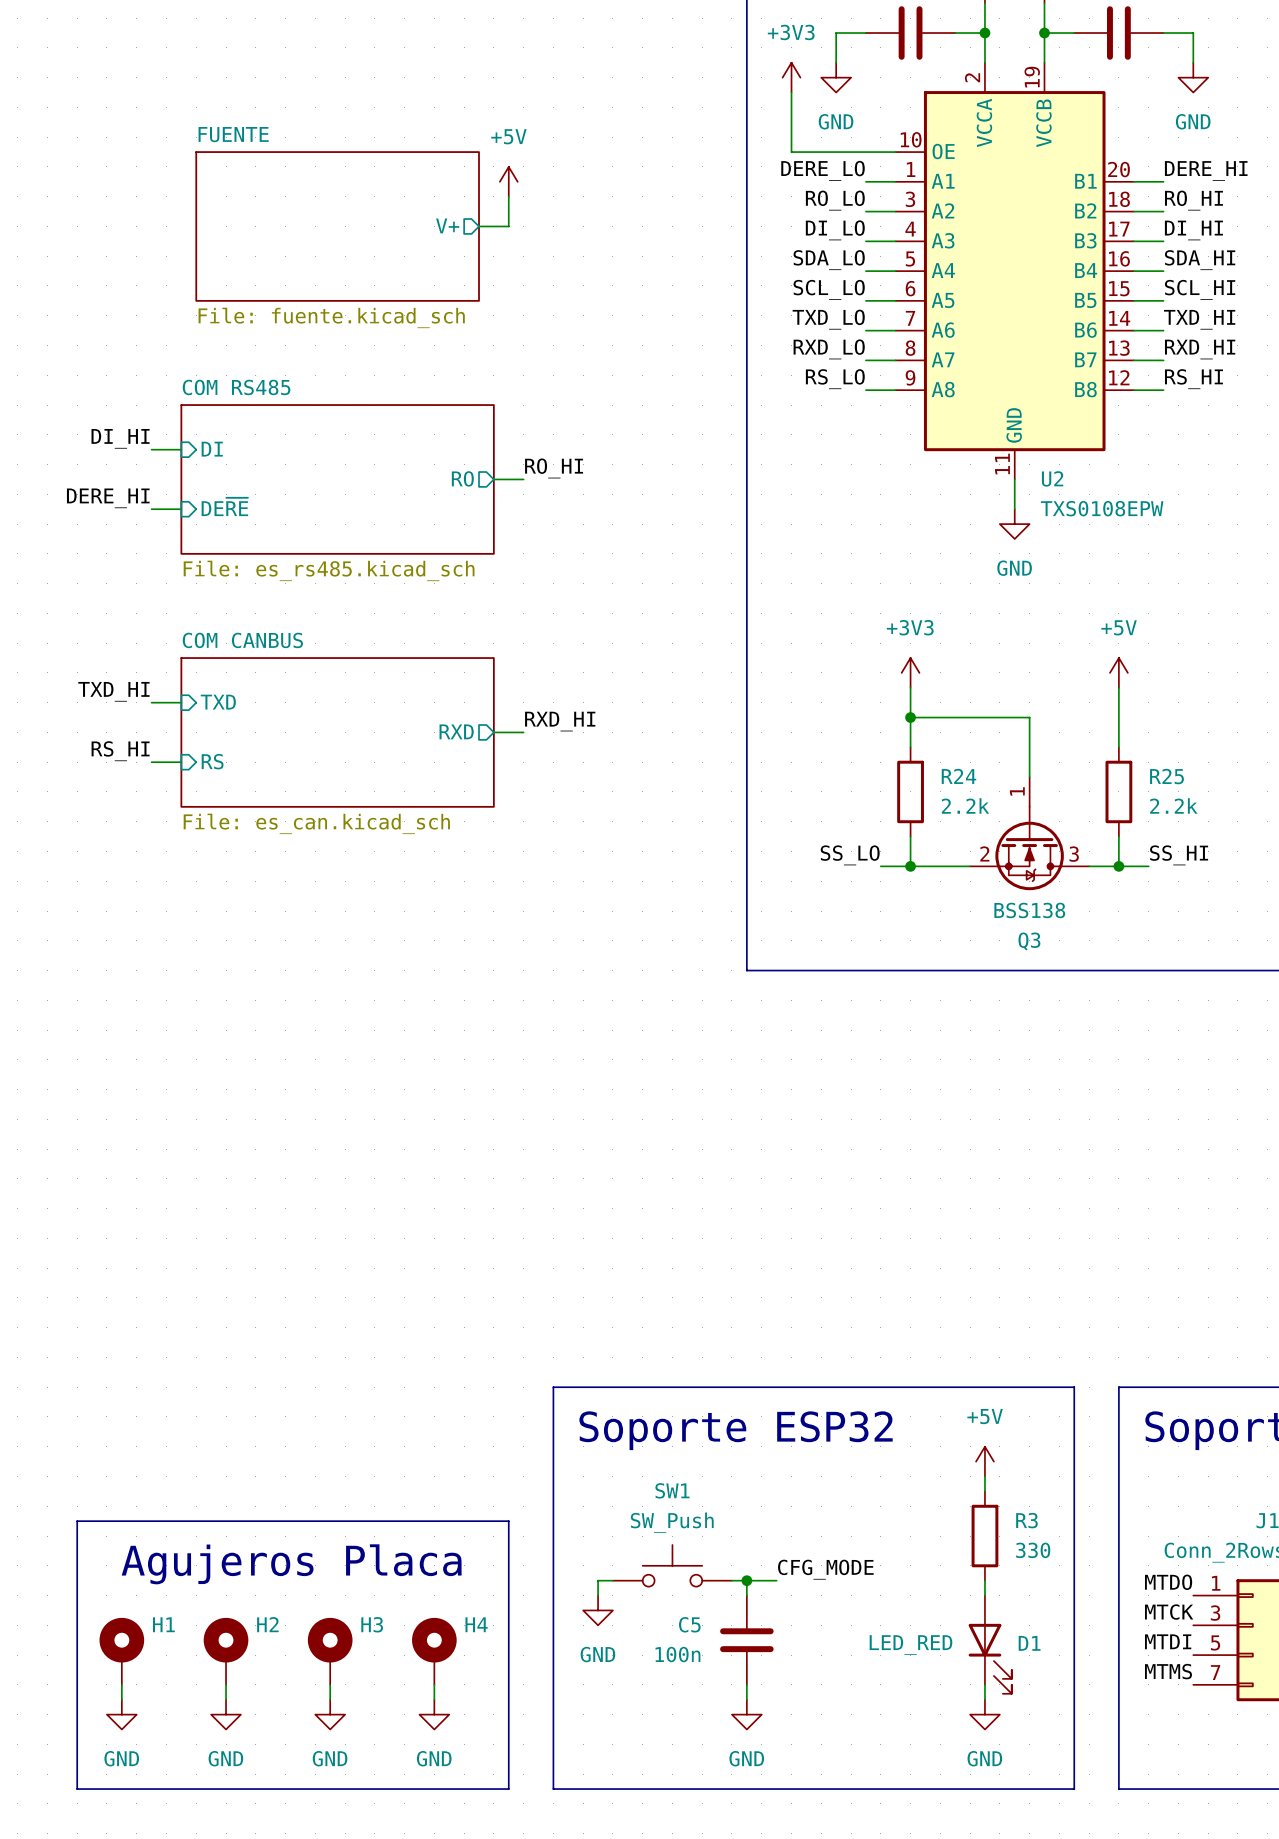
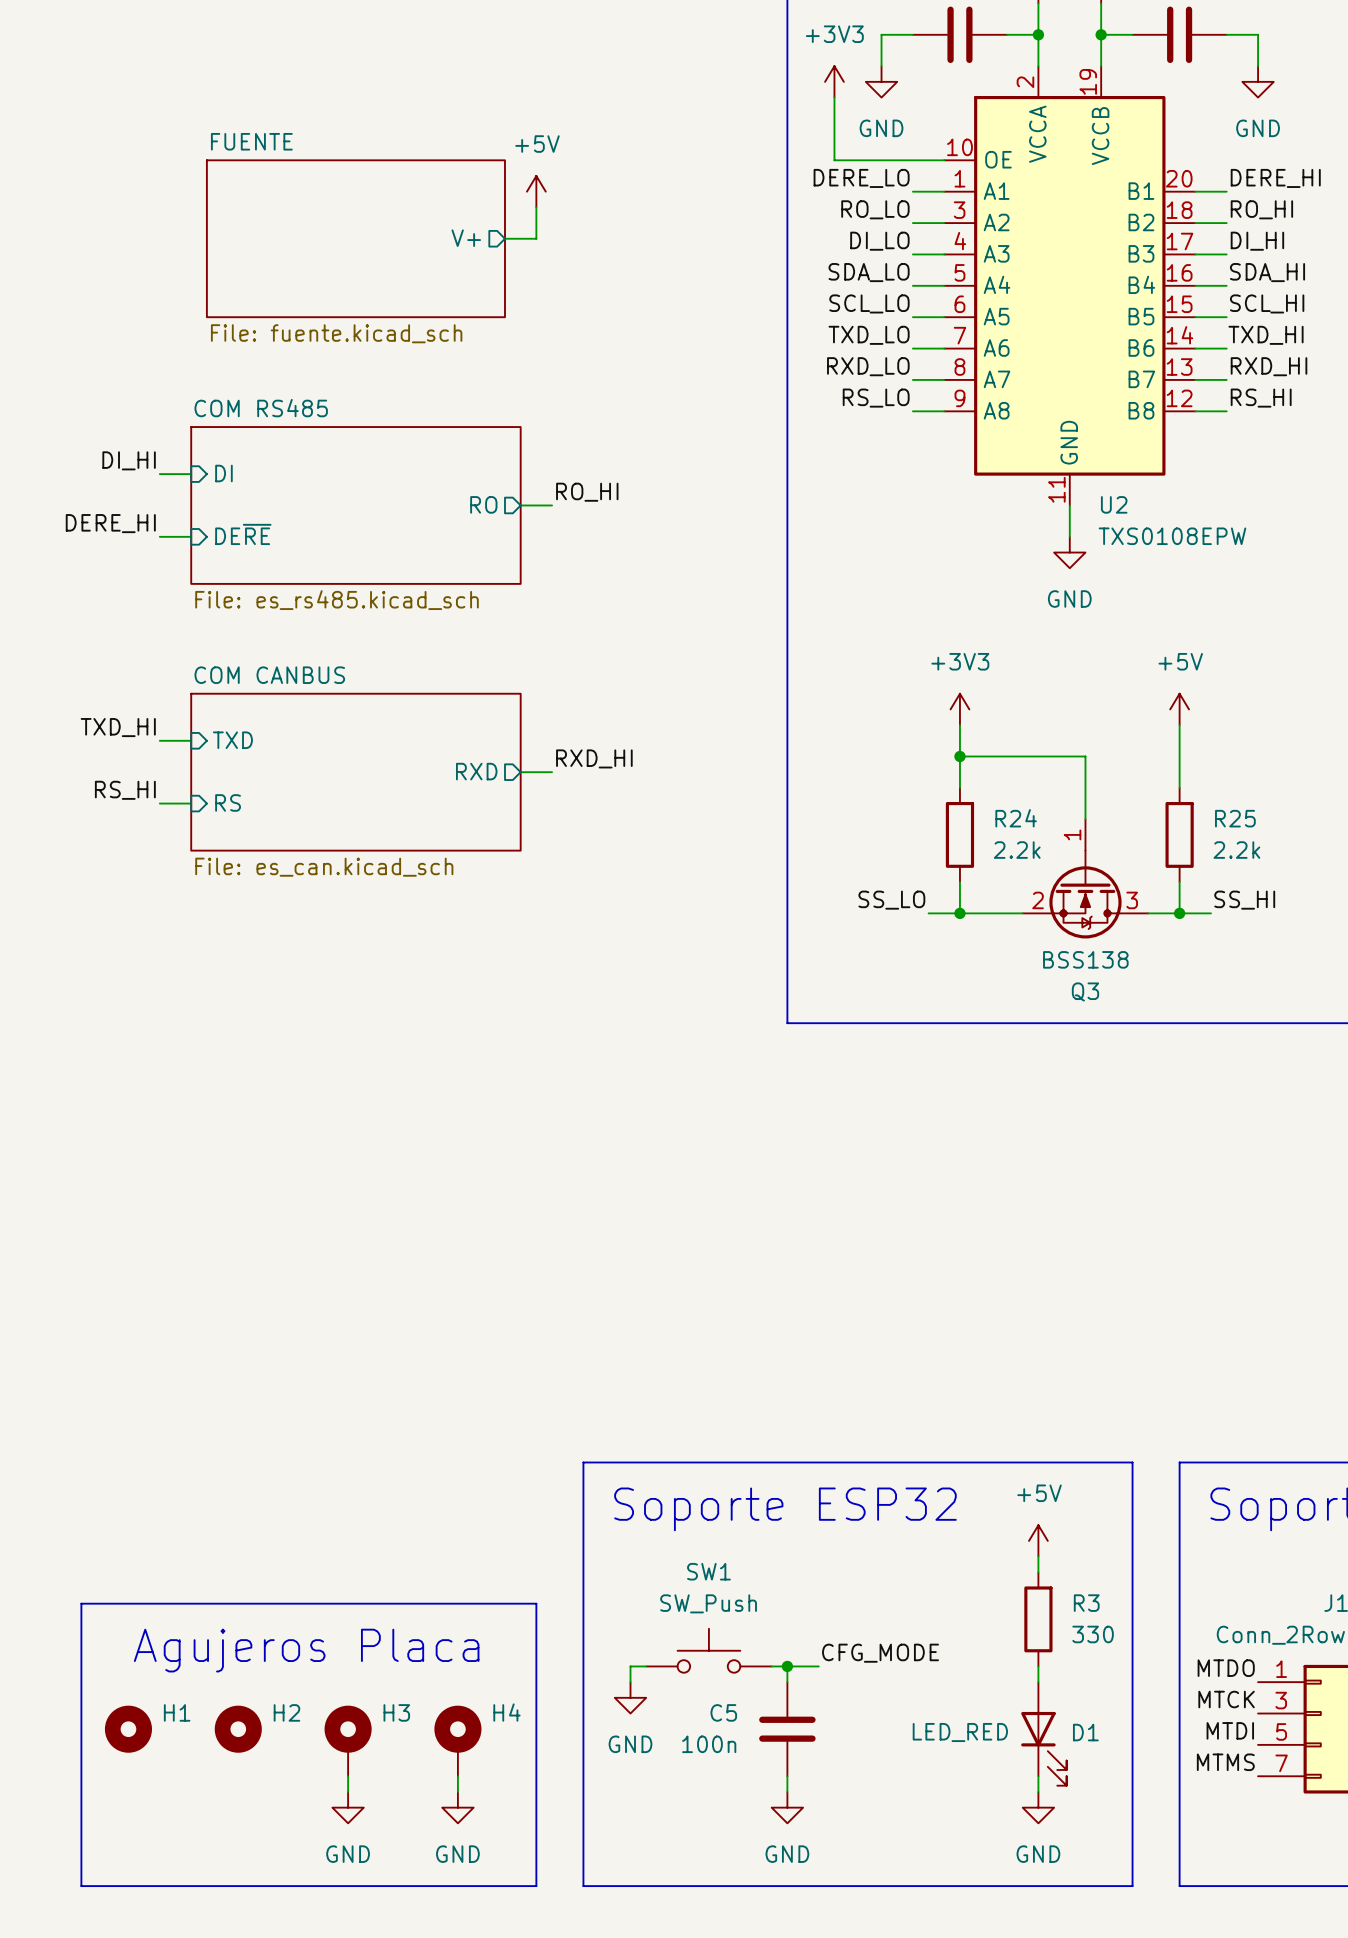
H1 symbol: [99, 1617, 145, 1685] -> [104, 1705, 152, 1753]
H2 symbol: [203, 1617, 249, 1685] -> [214, 1705, 262, 1753]
wire: (121, 1684) (121, 1699) -> none
wire: (226, 1684) (226, 1699) -> none
power symbol: GND (121, 1714) -> none
power symbol: GND (226, 1714) -> none

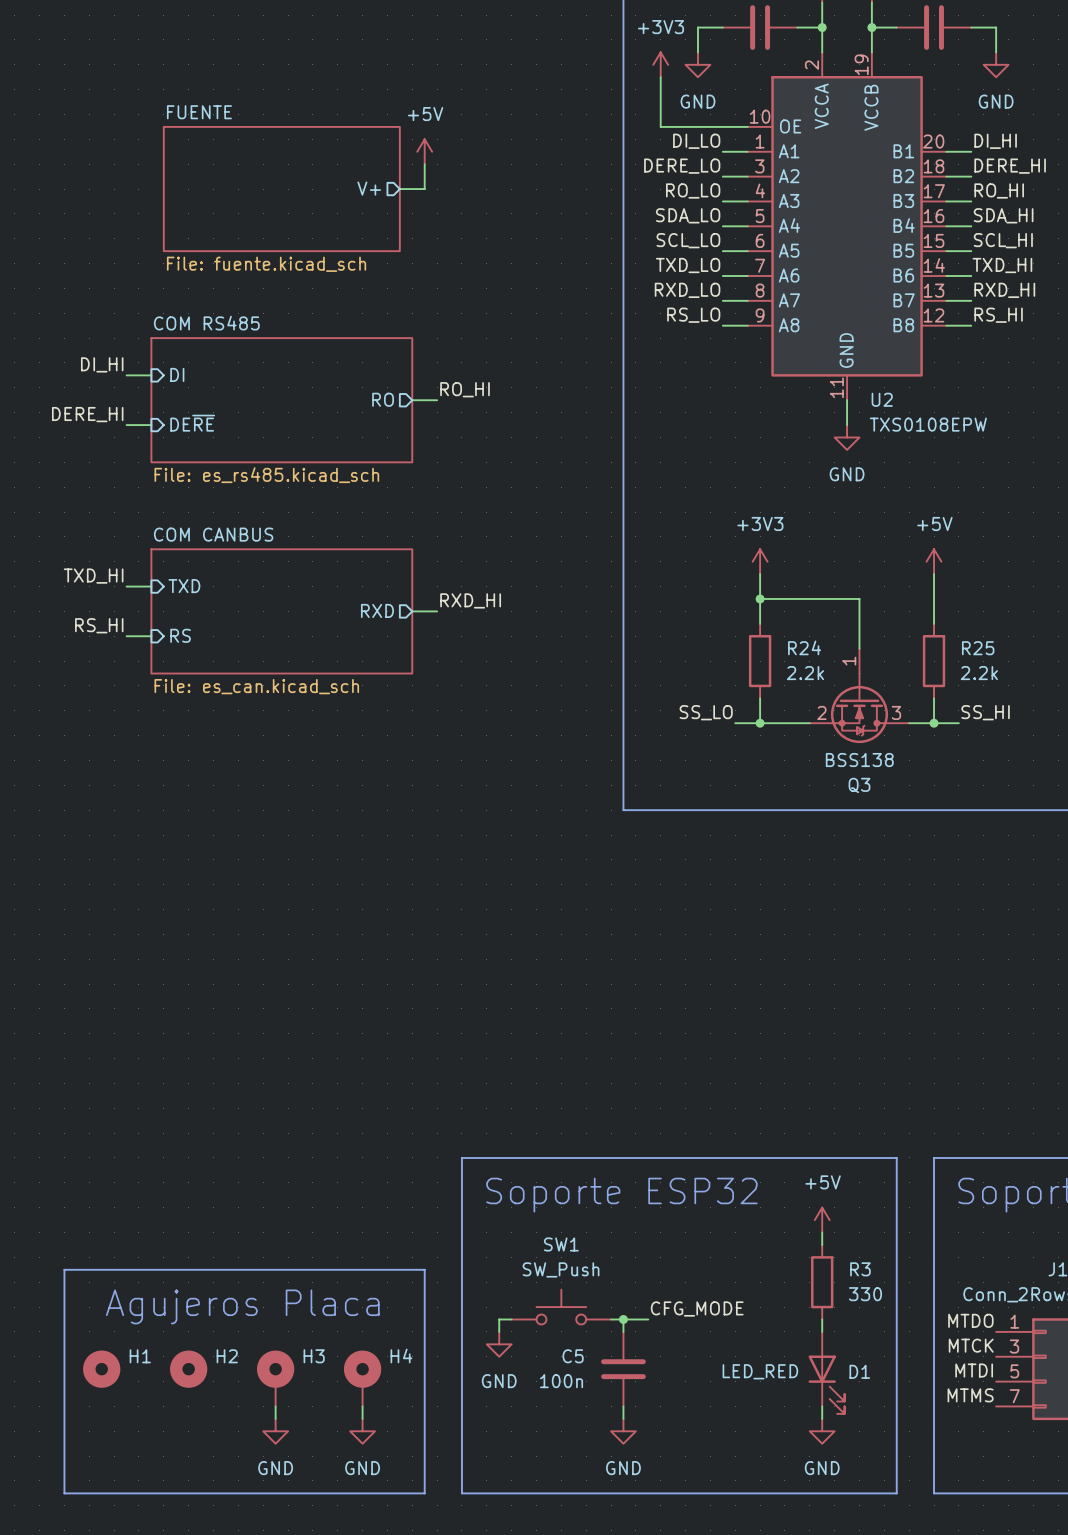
label: DERE_LO (861, 178) -> DI_LO (696, 141)
label: DERE_HI (1275, 178) -> DI_HI (995, 141)
label: RO_LO (875, 209) -> DERE_LO (682, 166)
label: RO_HI (1261, 209) -> DERE_HI (1010, 166)
label: DI_LO (879, 241) -> RO_LO (693, 190)
label: DI_HI (1257, 241) -> RO_HI (999, 190)

